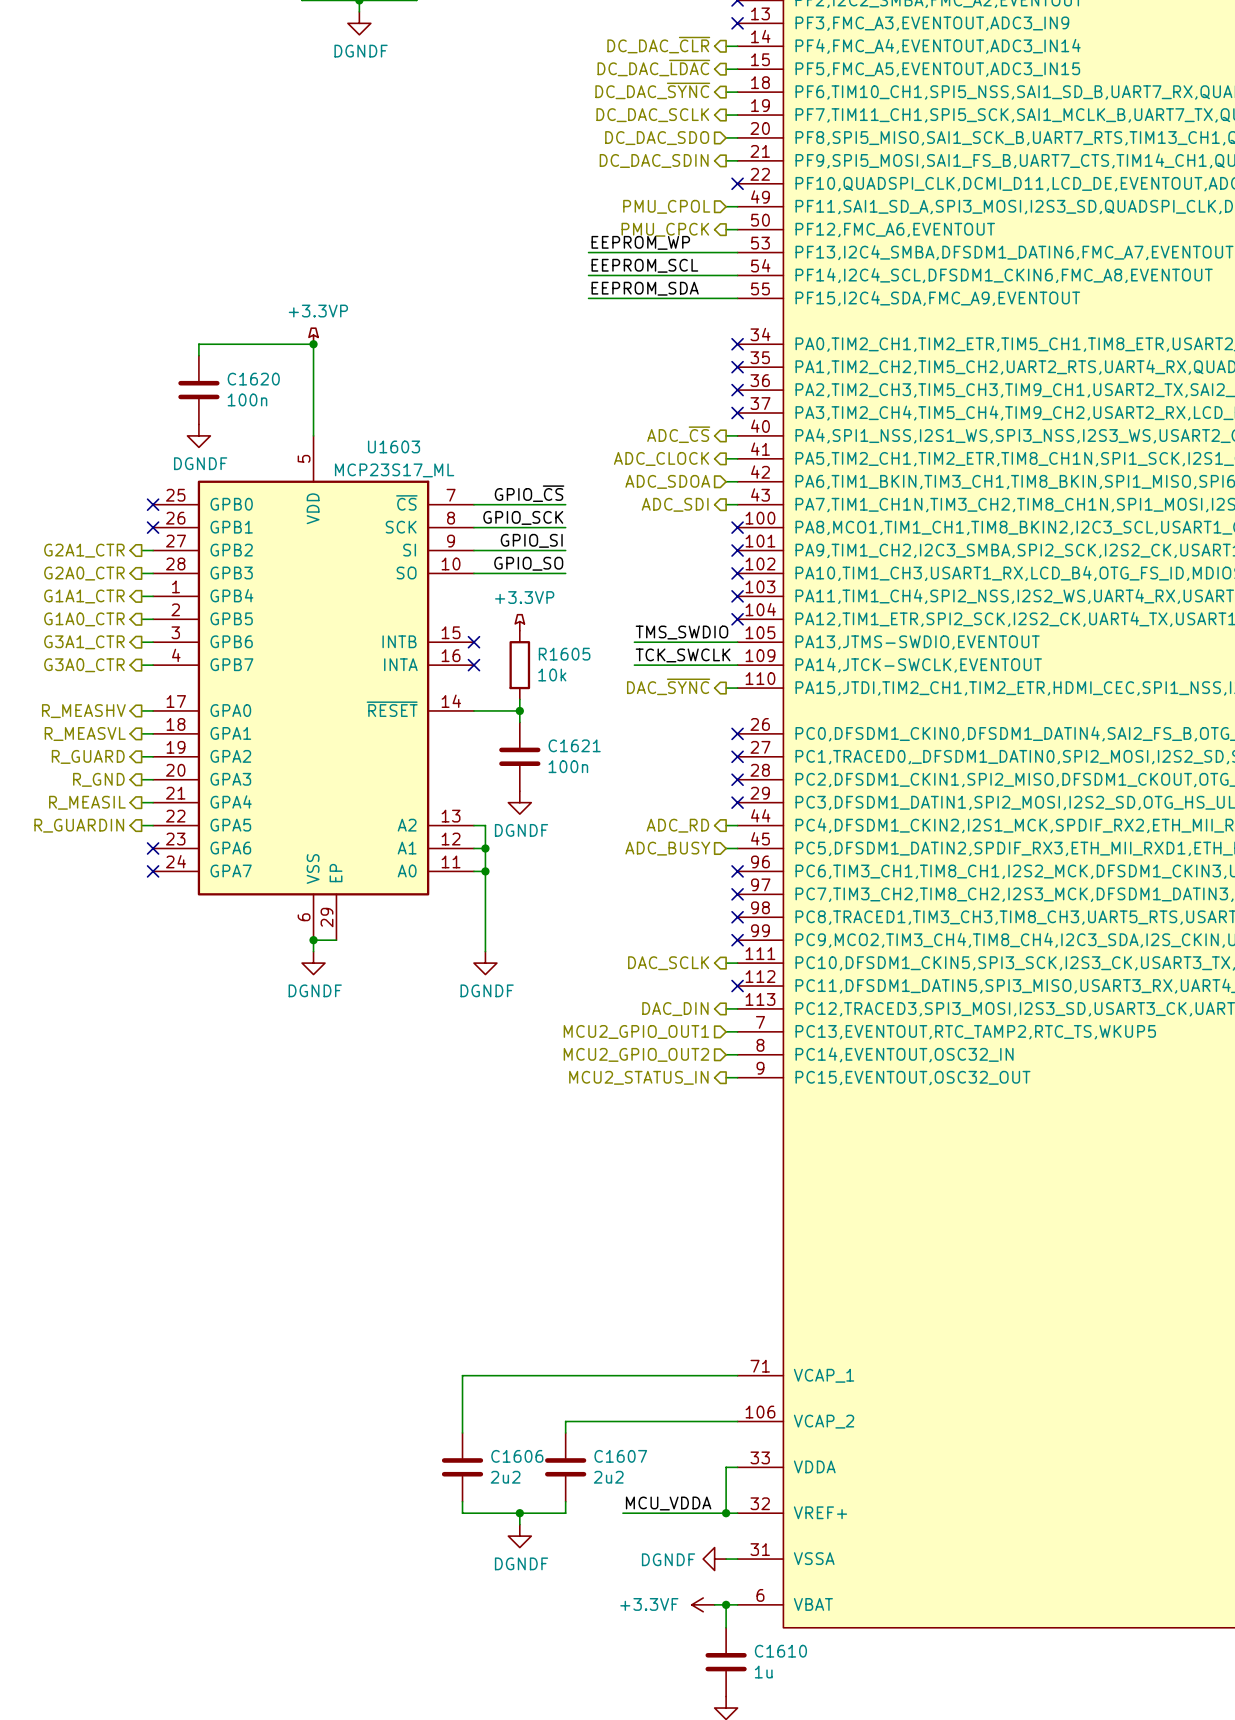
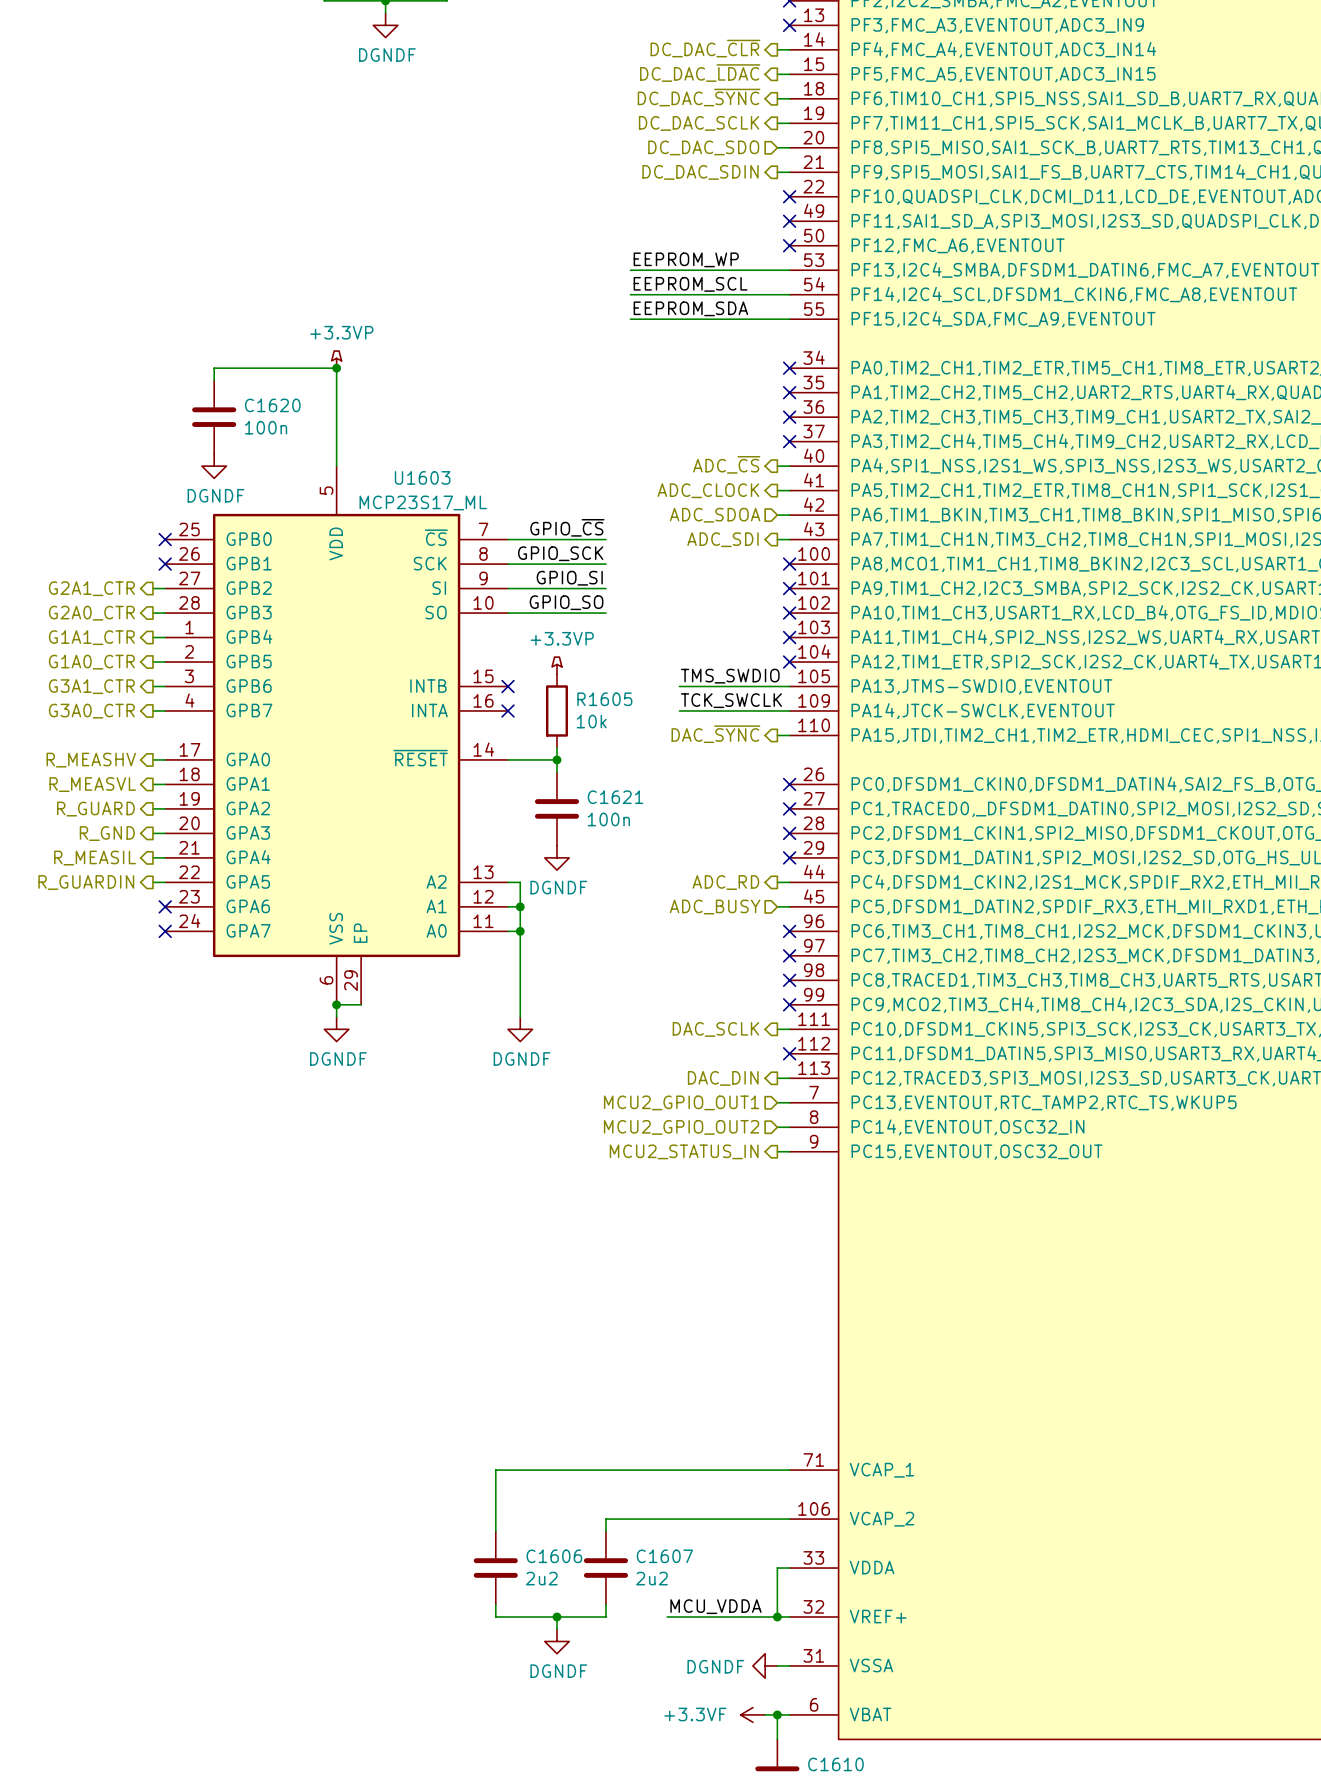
hierarchical label: PMU_CPOL (666, 206) -> none
wire: (726, 206) (737, 206) -> none
no-connect mark: none -> (789, 221)
hierarchical label: PMU_CPCK (665, 229) -> none
wire: (726, 229) (737, 229) -> none
no-connect mark: none -> (789, 245)

